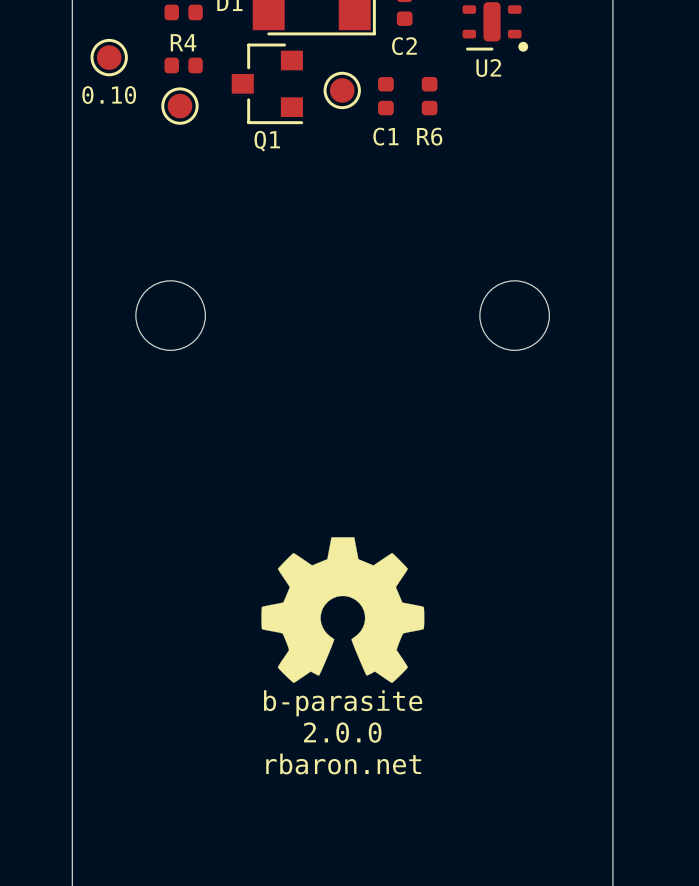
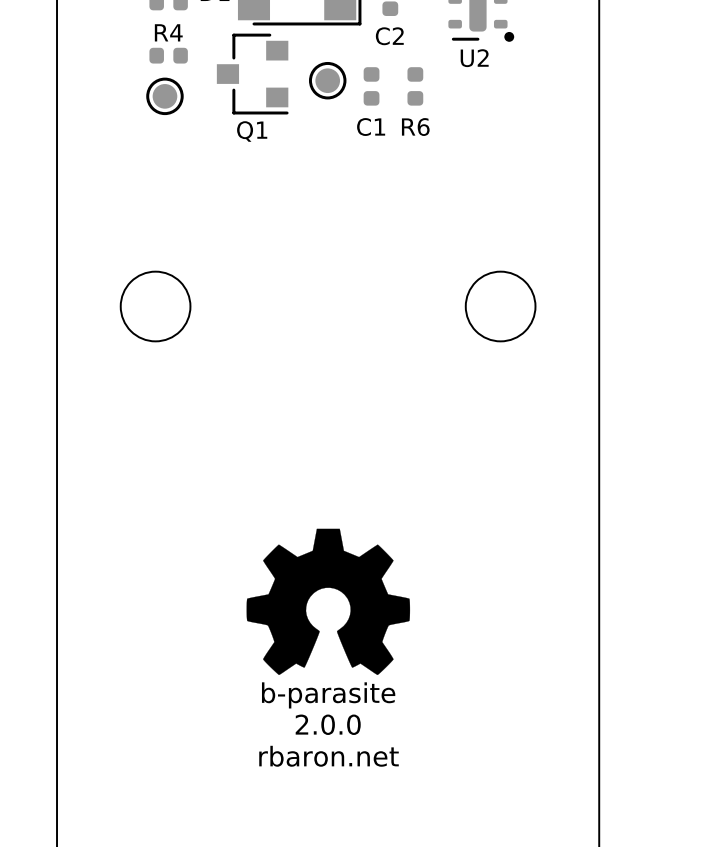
part: 0.10 (109, 57) -> none

